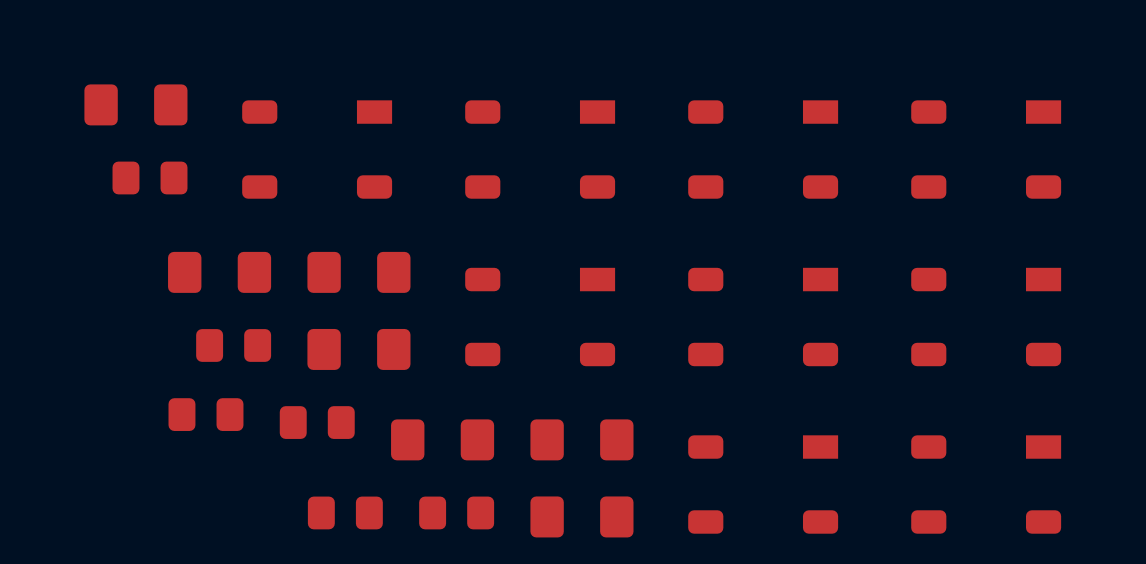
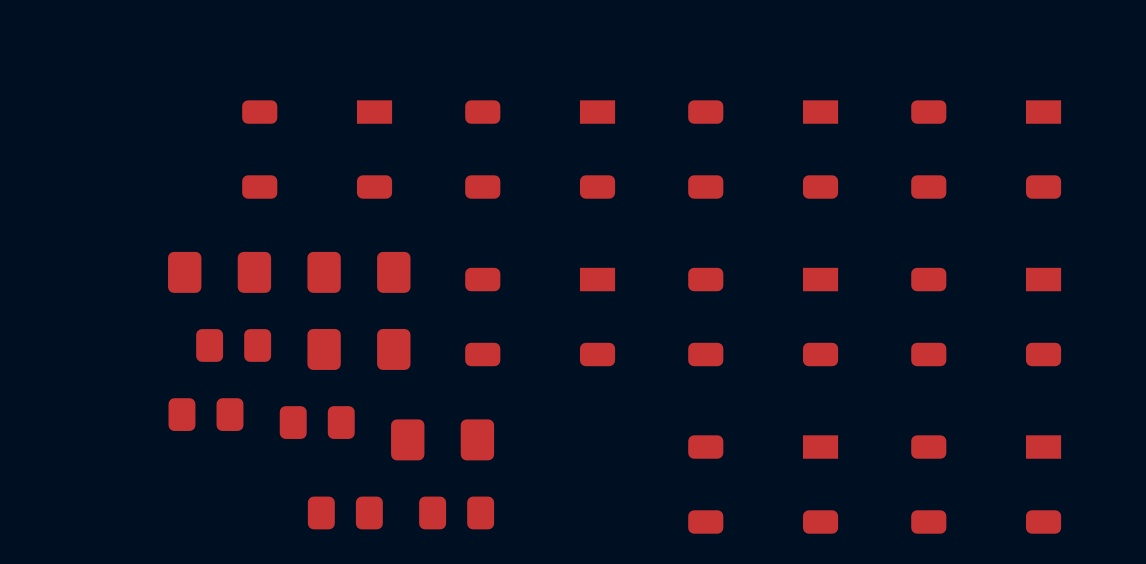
part: (135, 104) -> none
part: (150, 177) -> none
part: (581, 439) -> none
part: (581, 516) -> none

